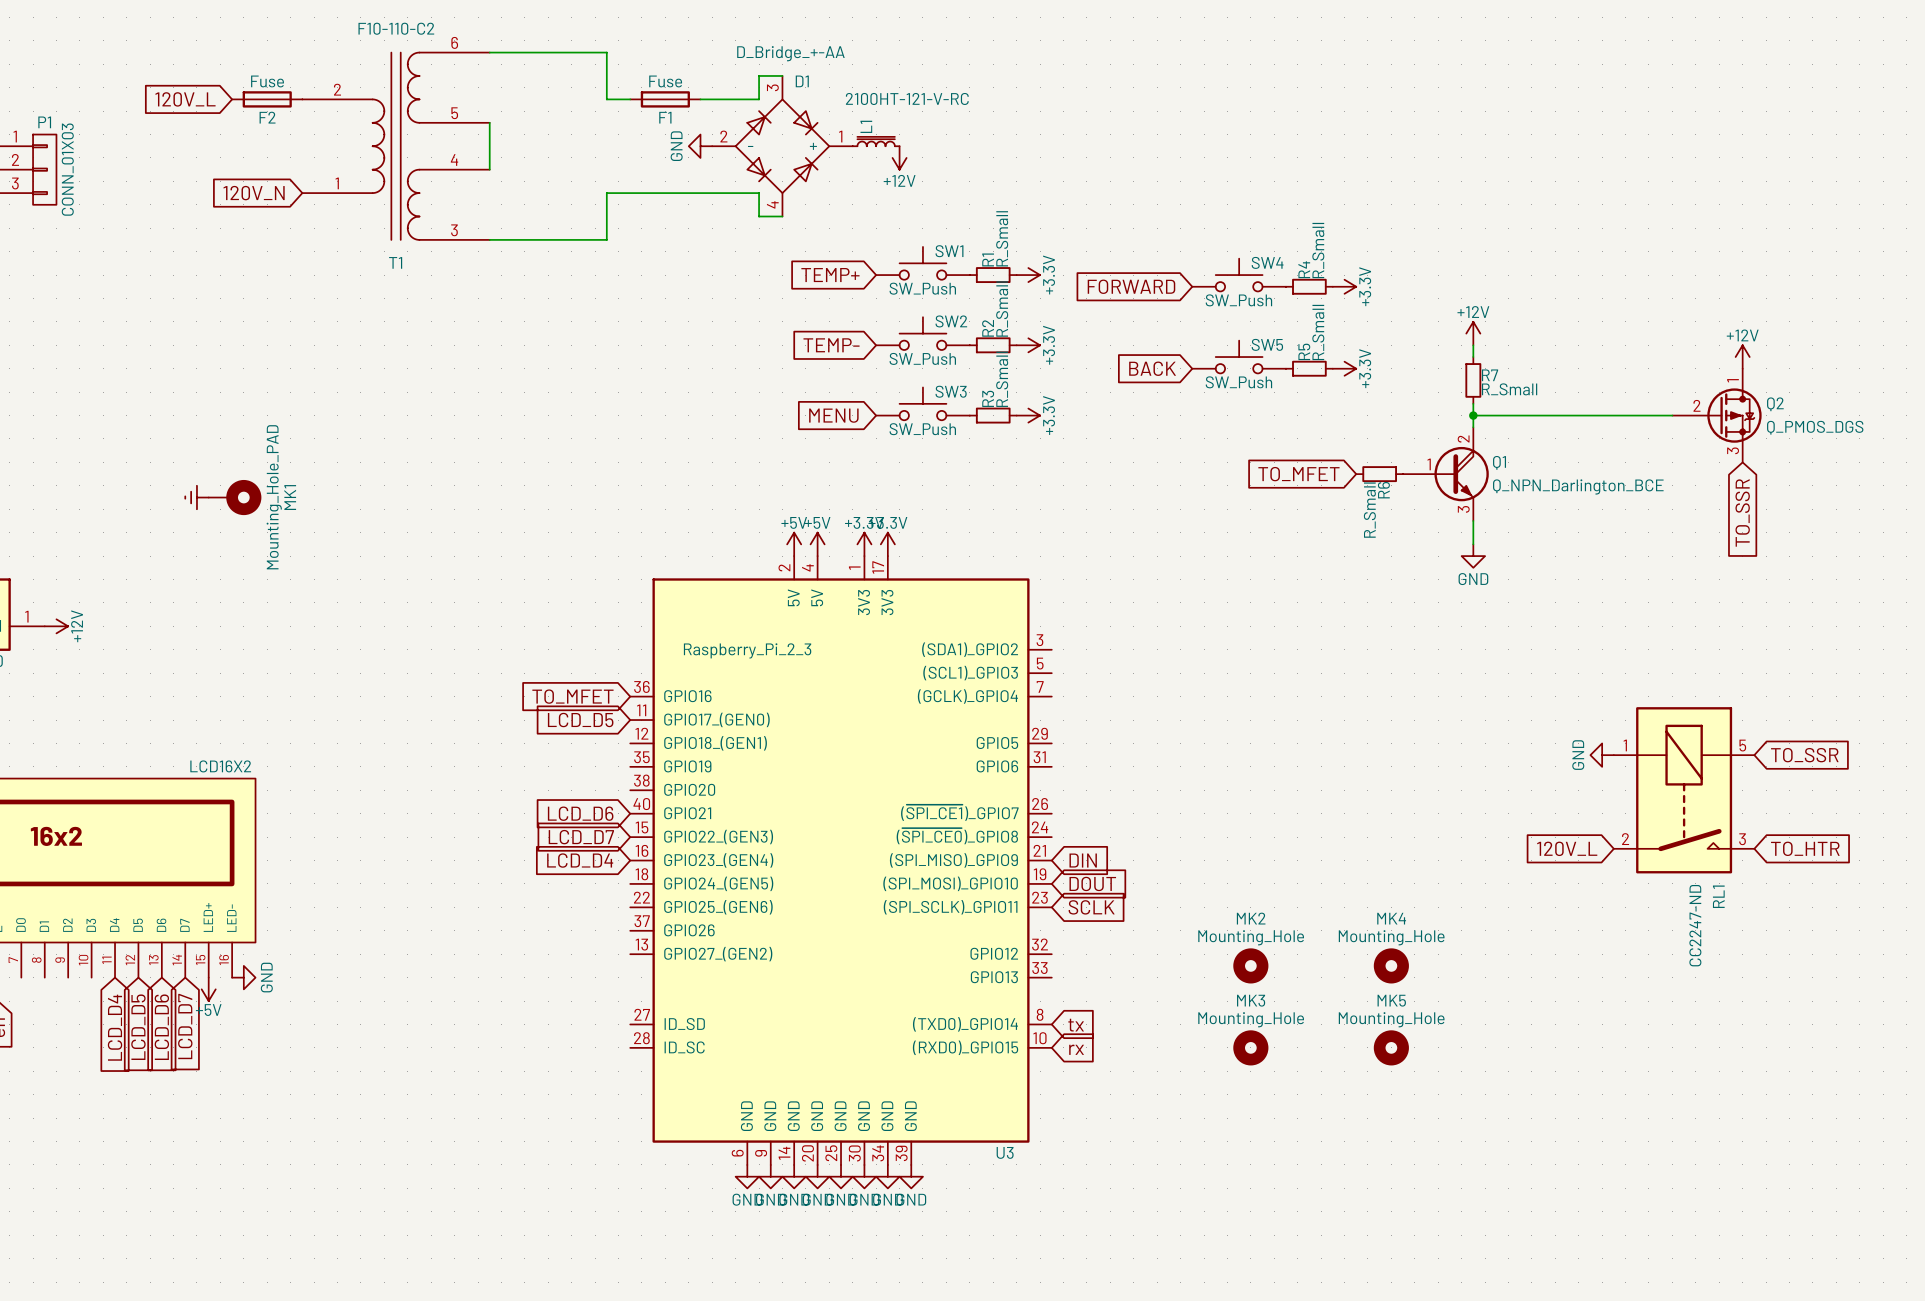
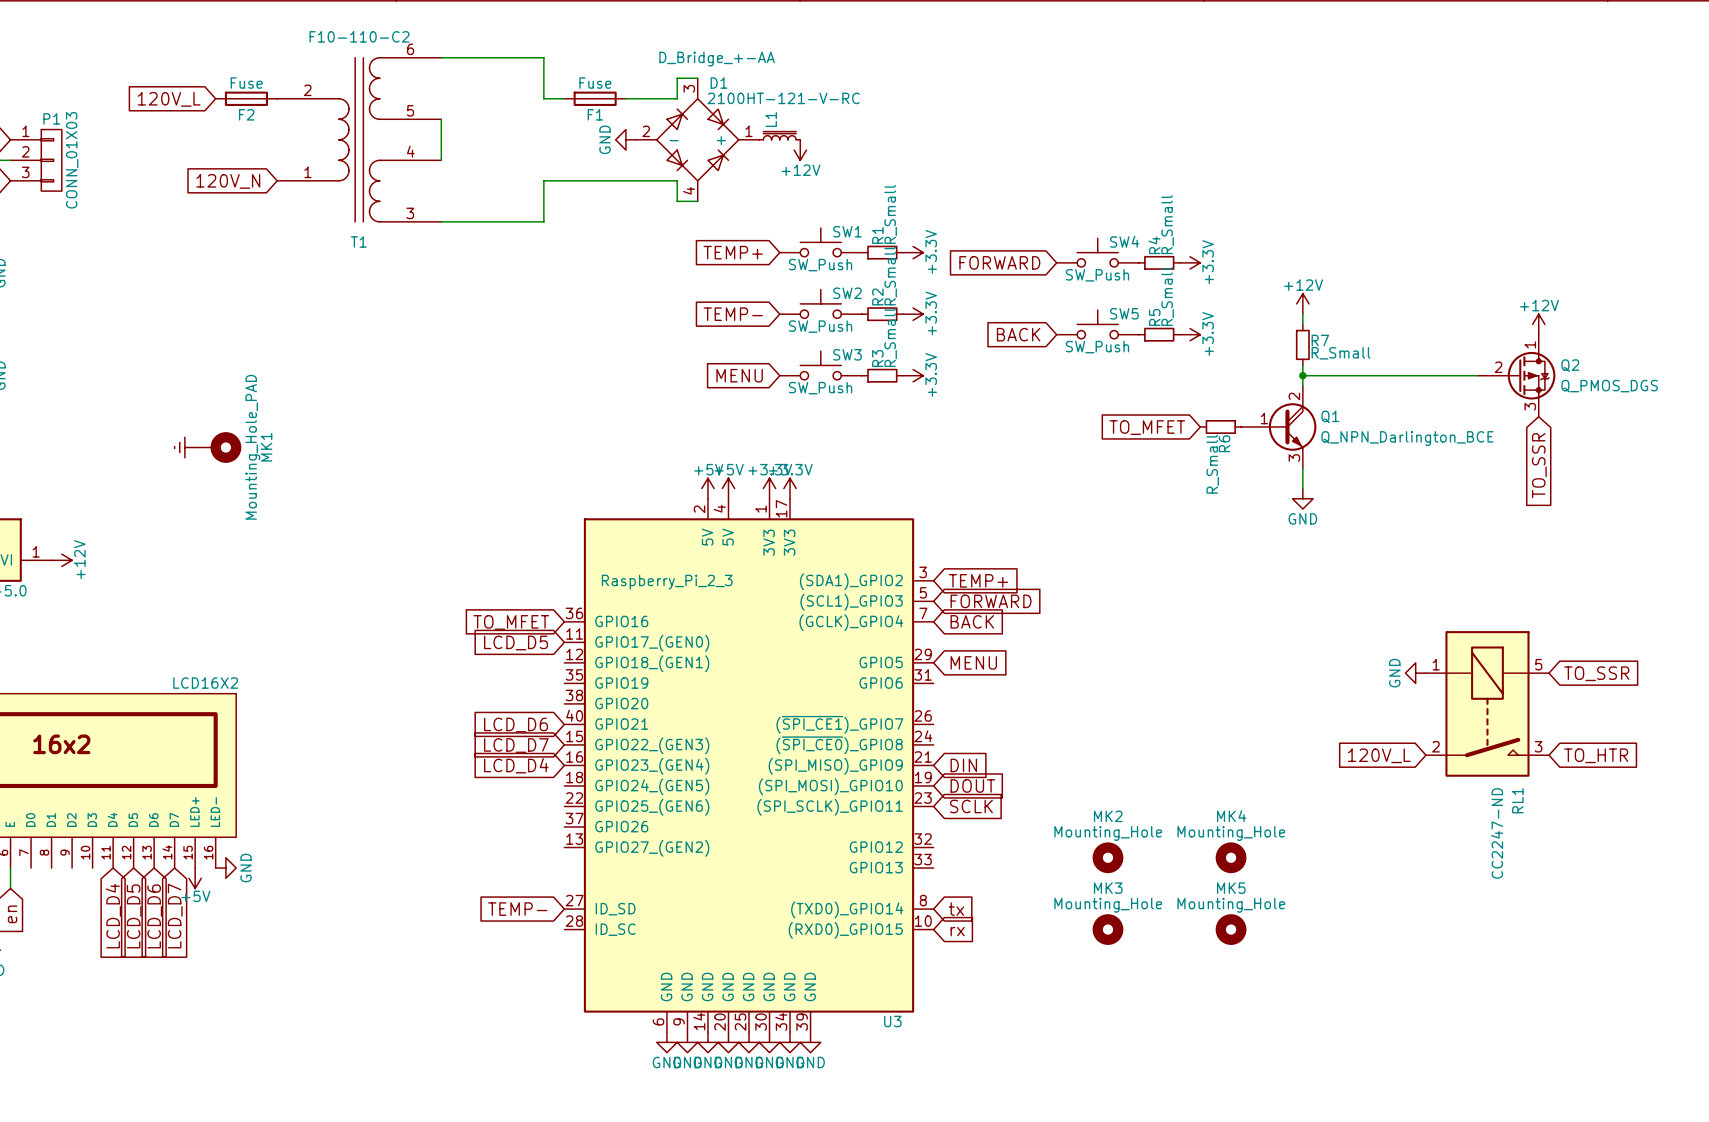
global label: none -> TEMP+ (978, 580)
global label: none -> FORWARD (991, 601)
global label: none -> BACK (972, 621)
global label: none -> MENU (973, 662)
global label: none -> TEMP- (517, 909)

